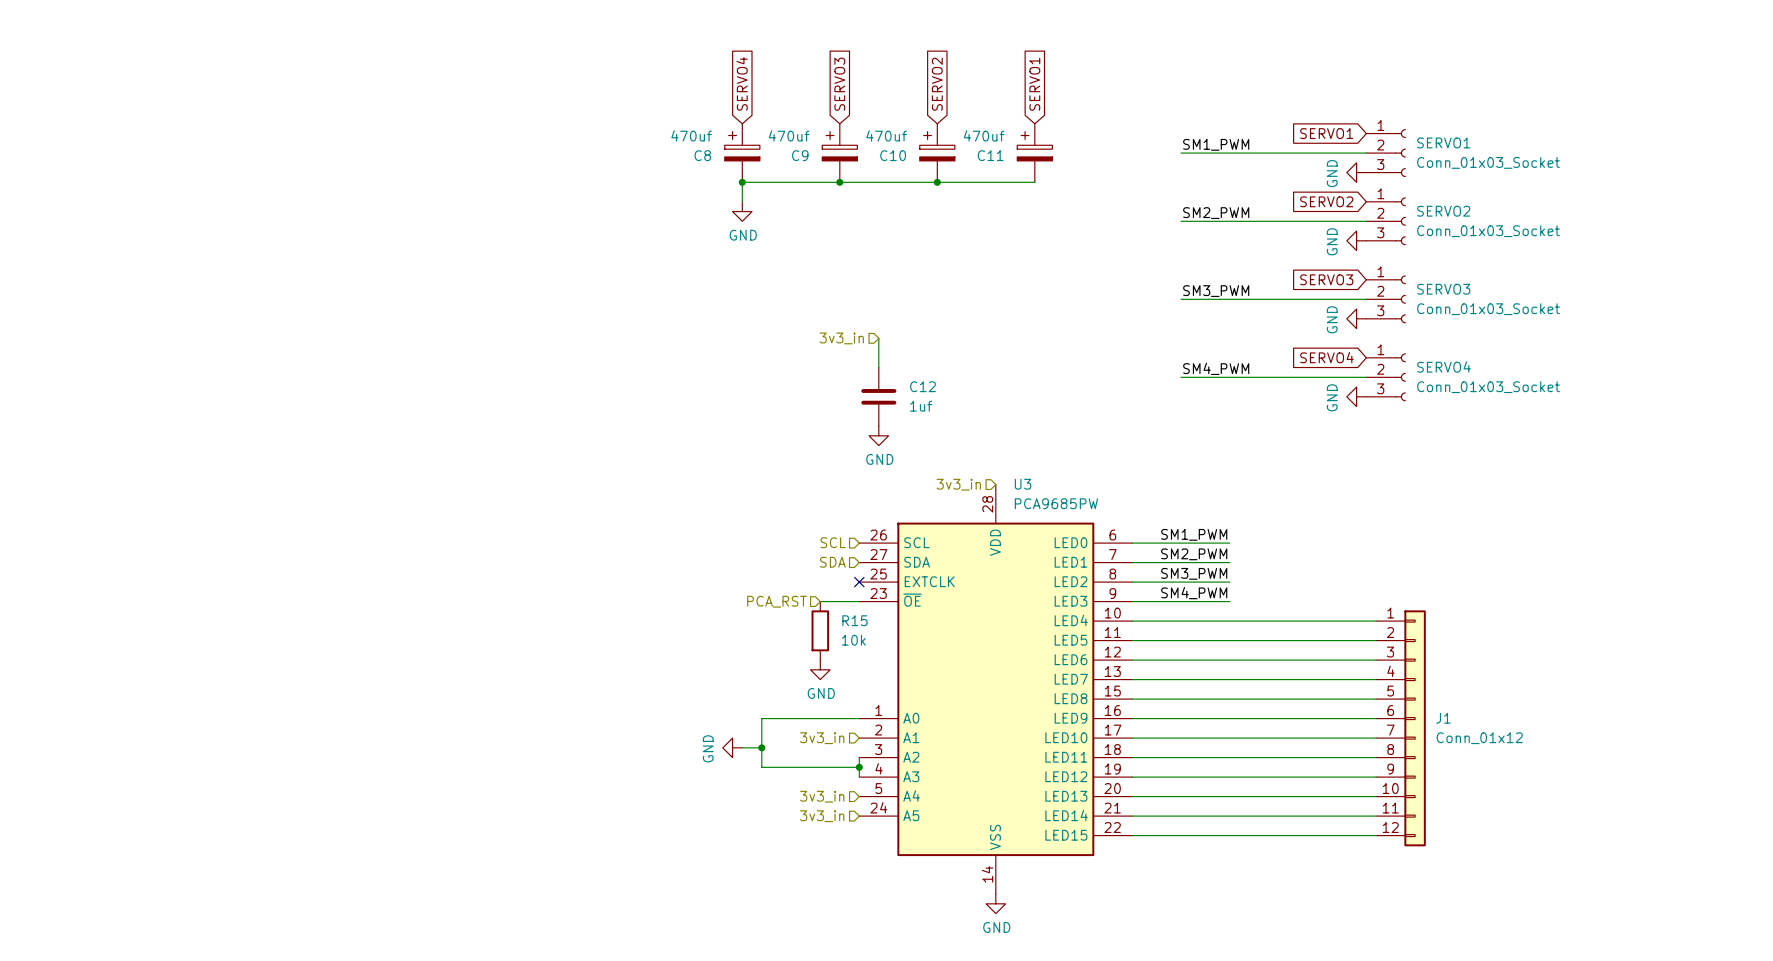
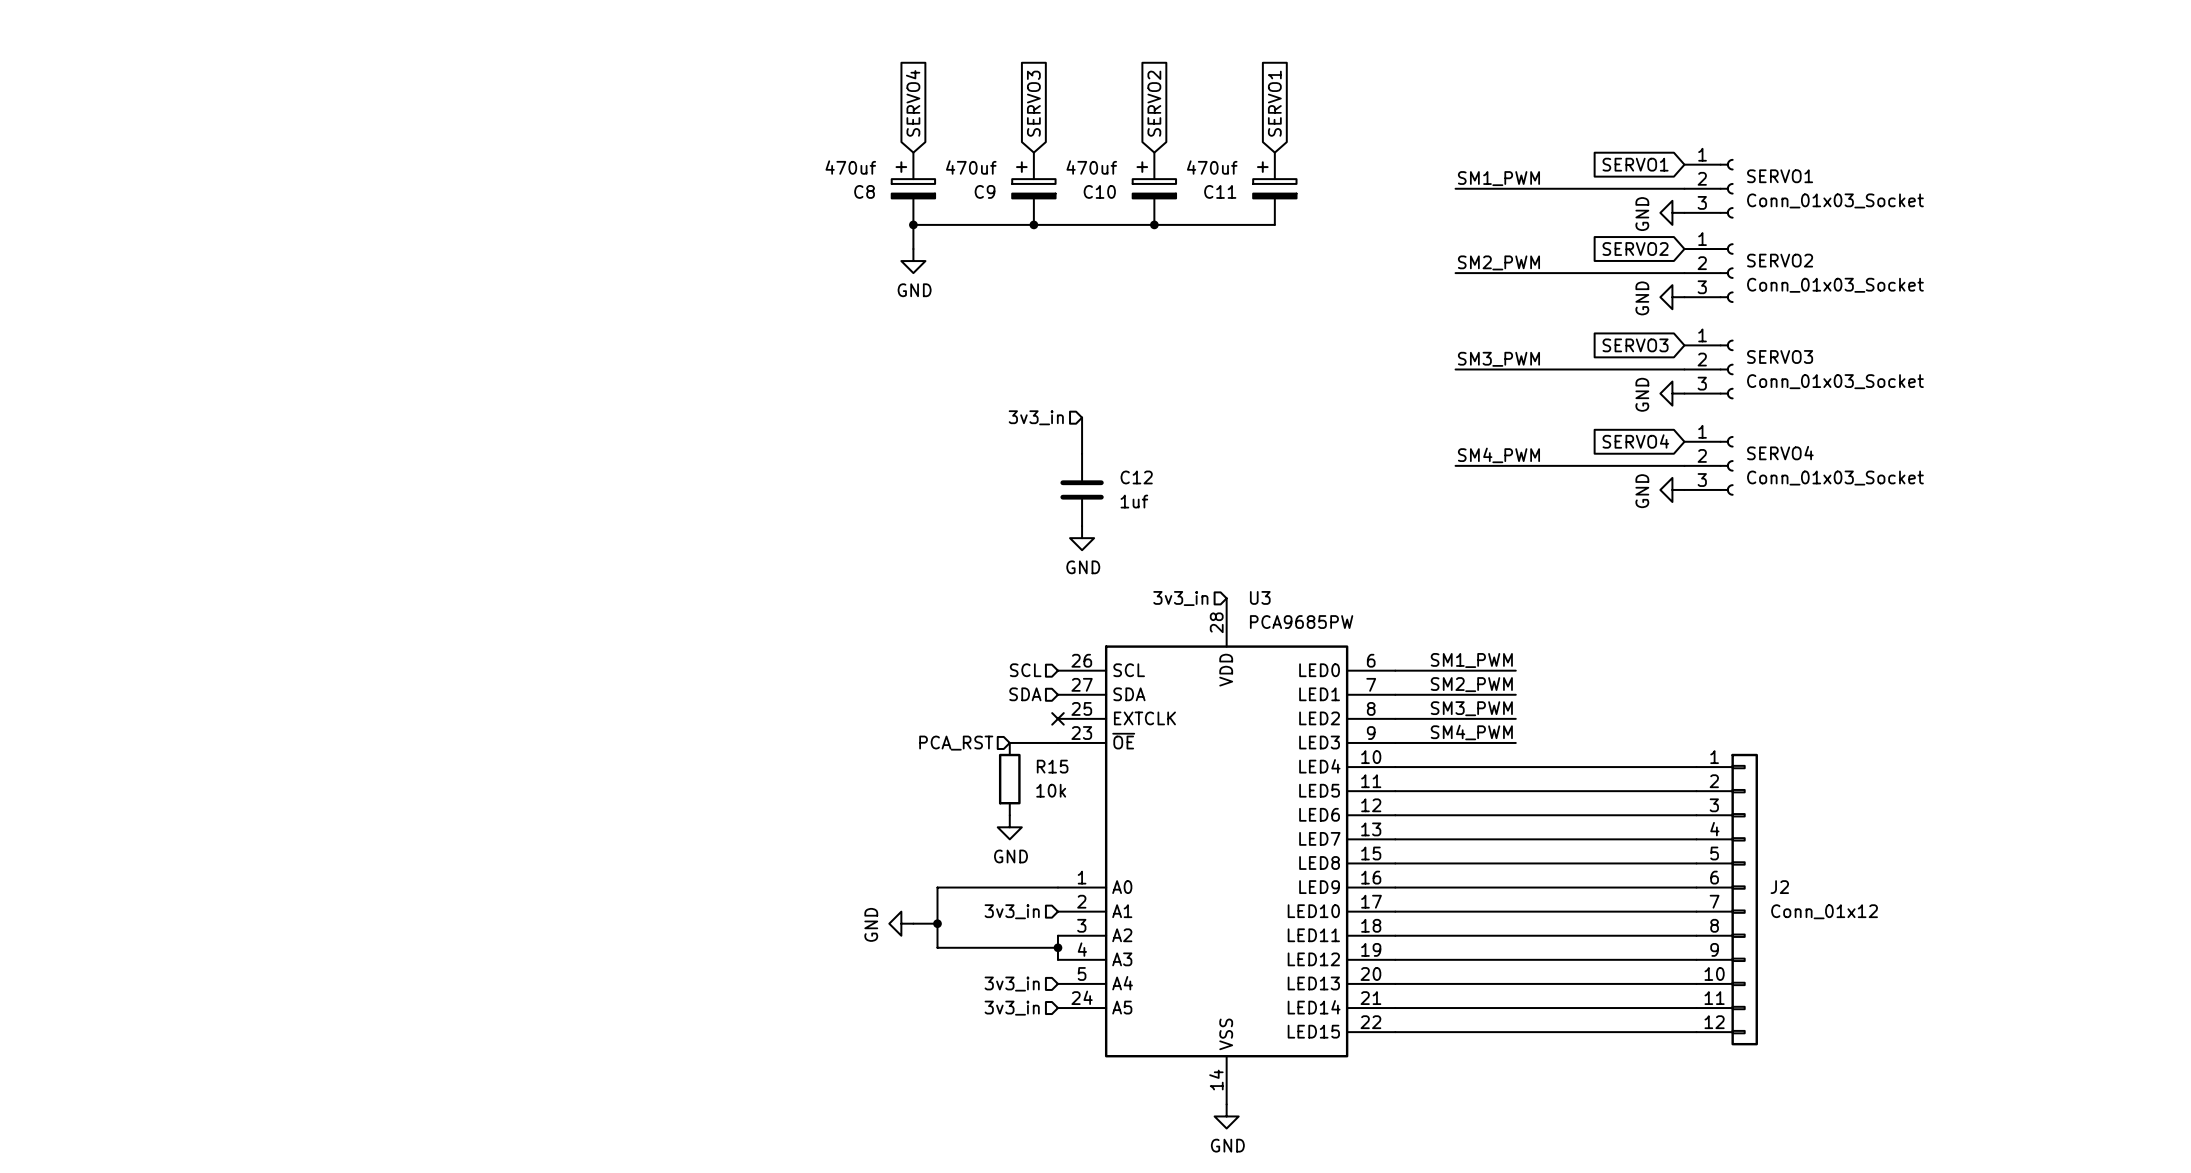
J1 name: J1 (1443, 718) -> J2 (1779, 887)

